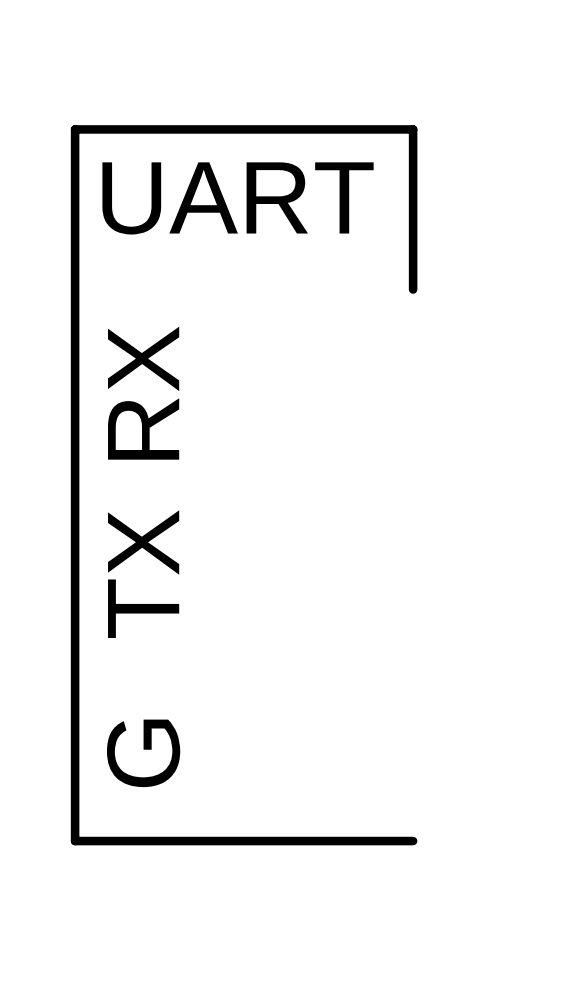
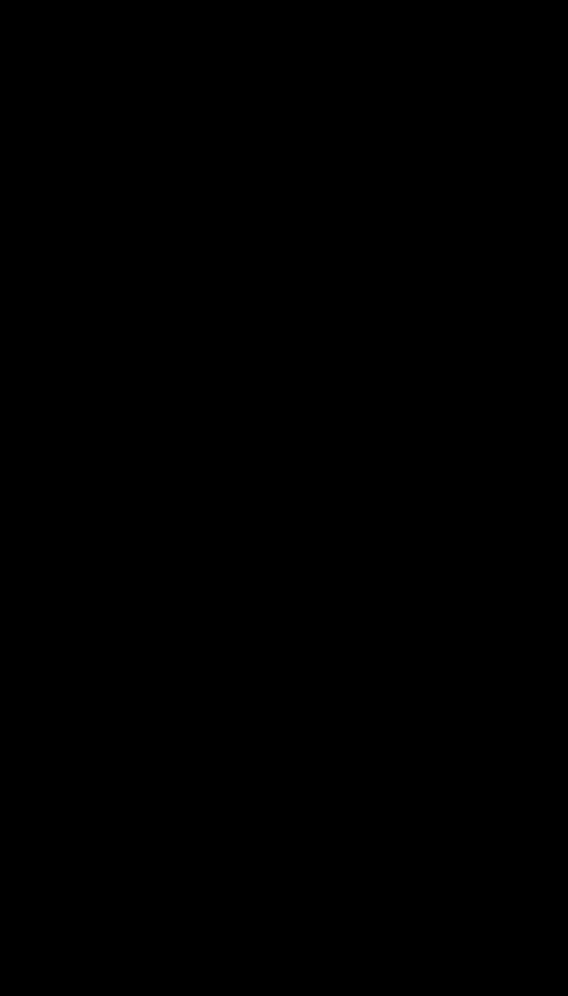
text: UART (238, 198) -> none
line: (413, 289) (413, 129) (75, 129) (75, 841) (413, 841) -> none
text: RX (143, 393) -> none
text: TX (143, 574) -> none
text: G (143, 753) -> none

